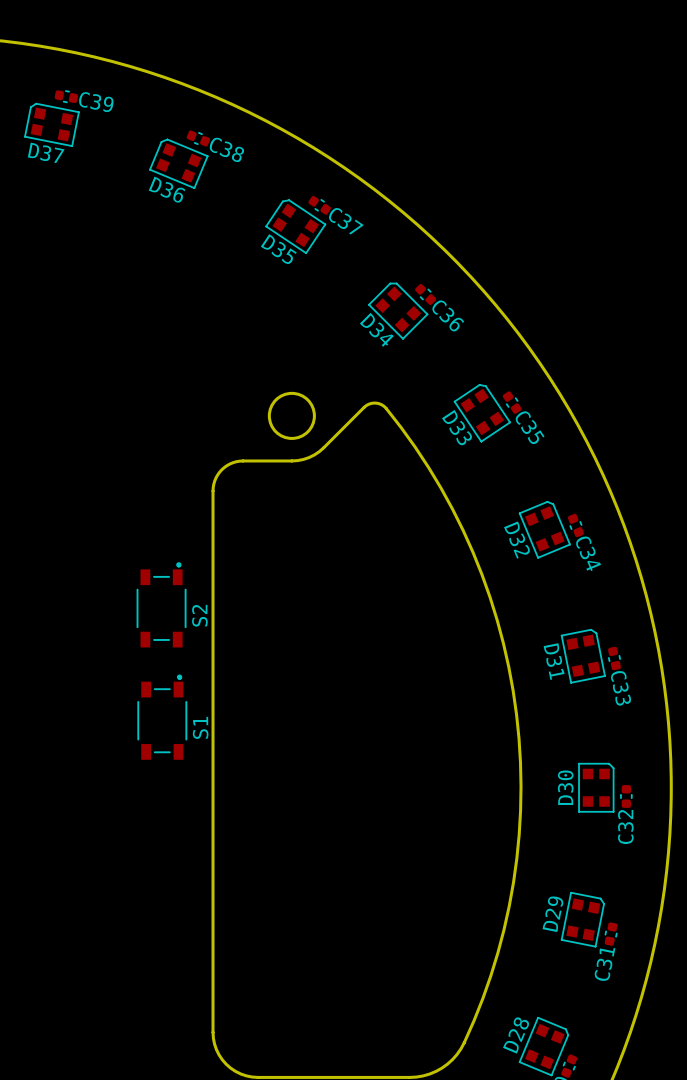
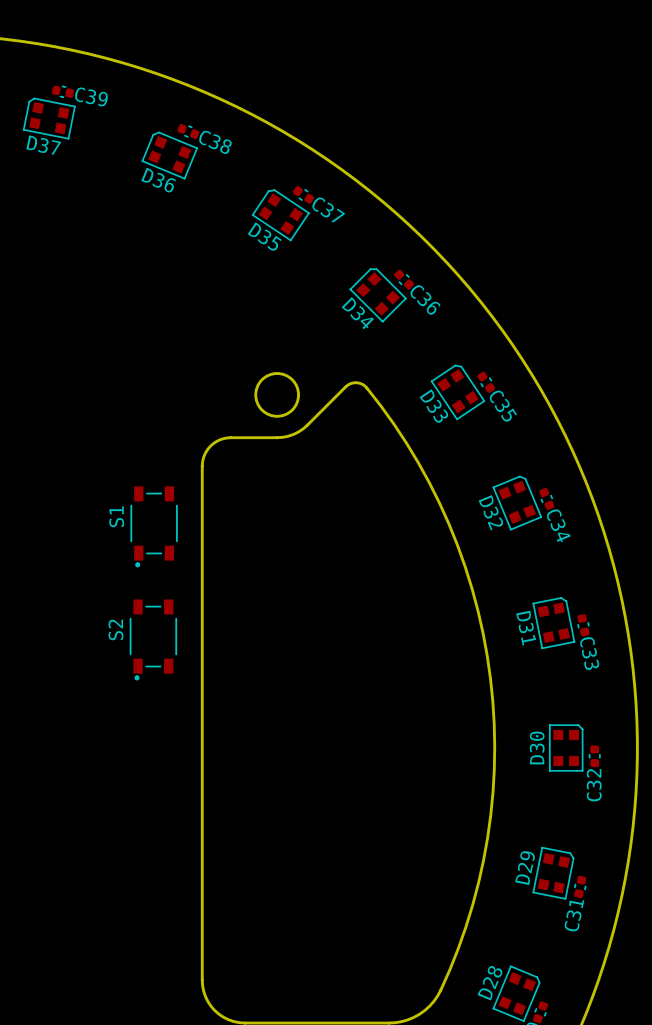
S2 rotation: 0° (161, 604) -> 180° (153, 639)
S2 position: (161, 604) -> (153, 639)
S1 rotation: 0° (162, 717) -> 180° (154, 526)
S1 position: (162, 717) -> (154, 526)

